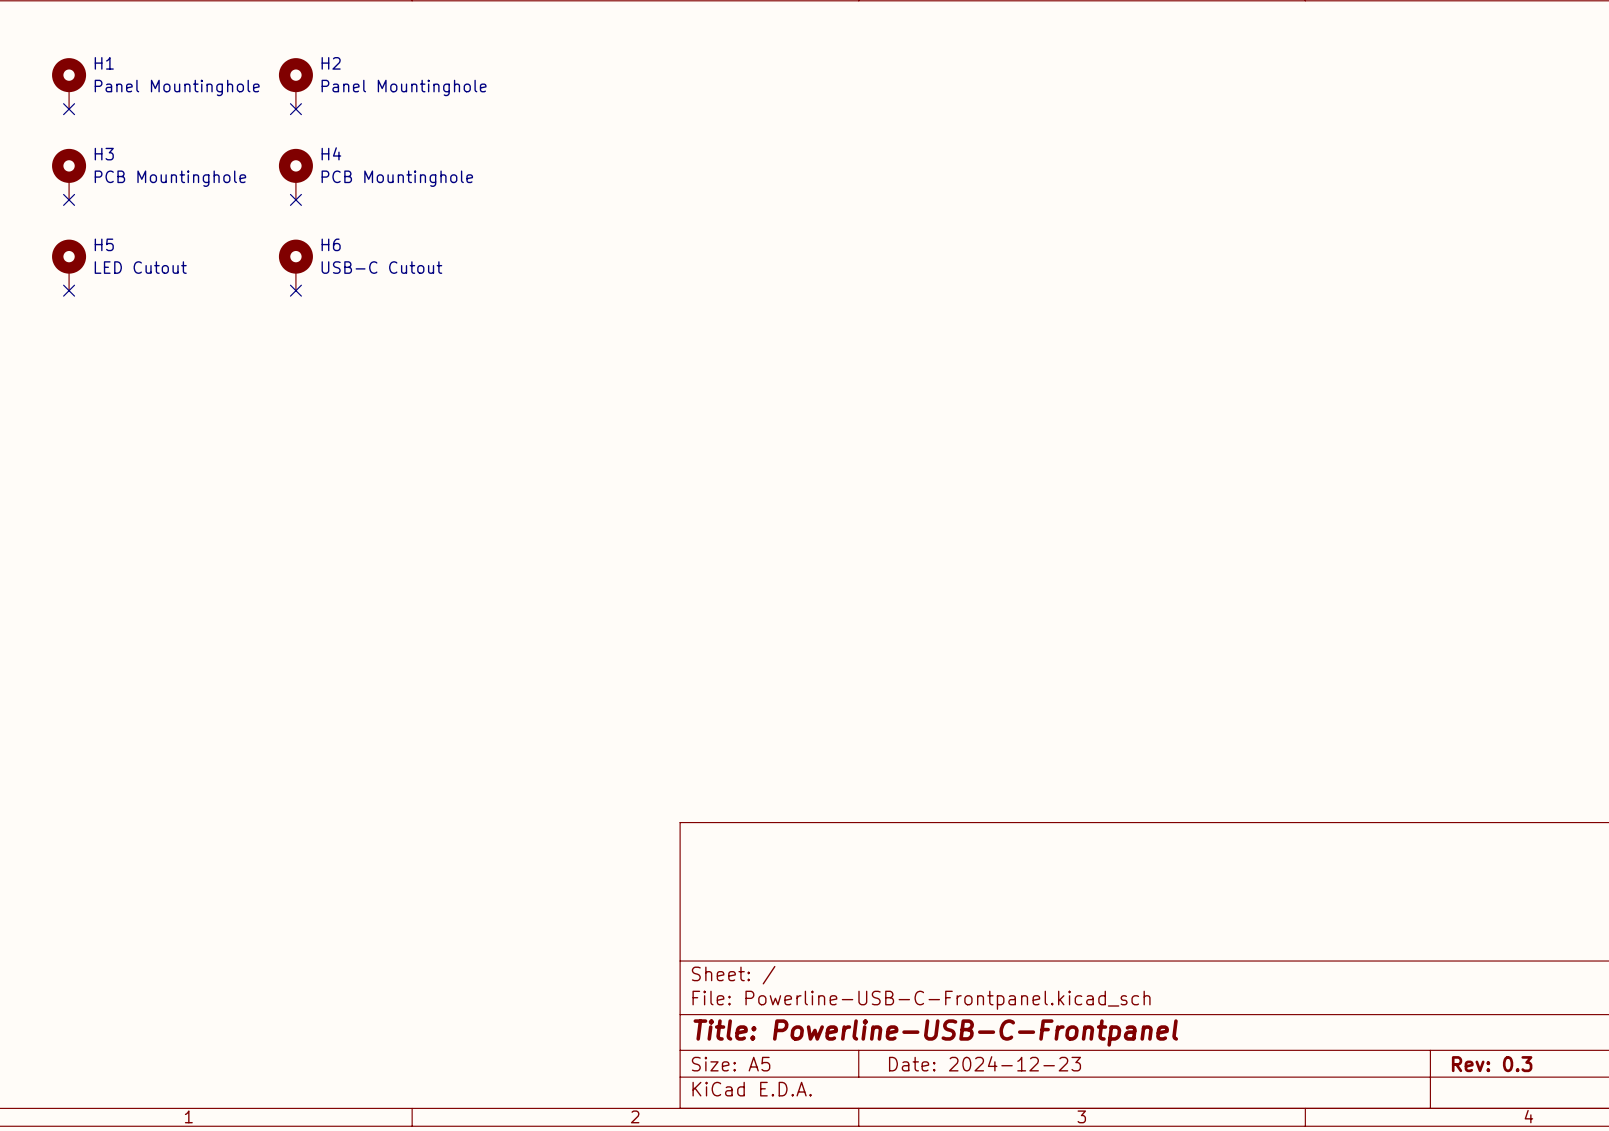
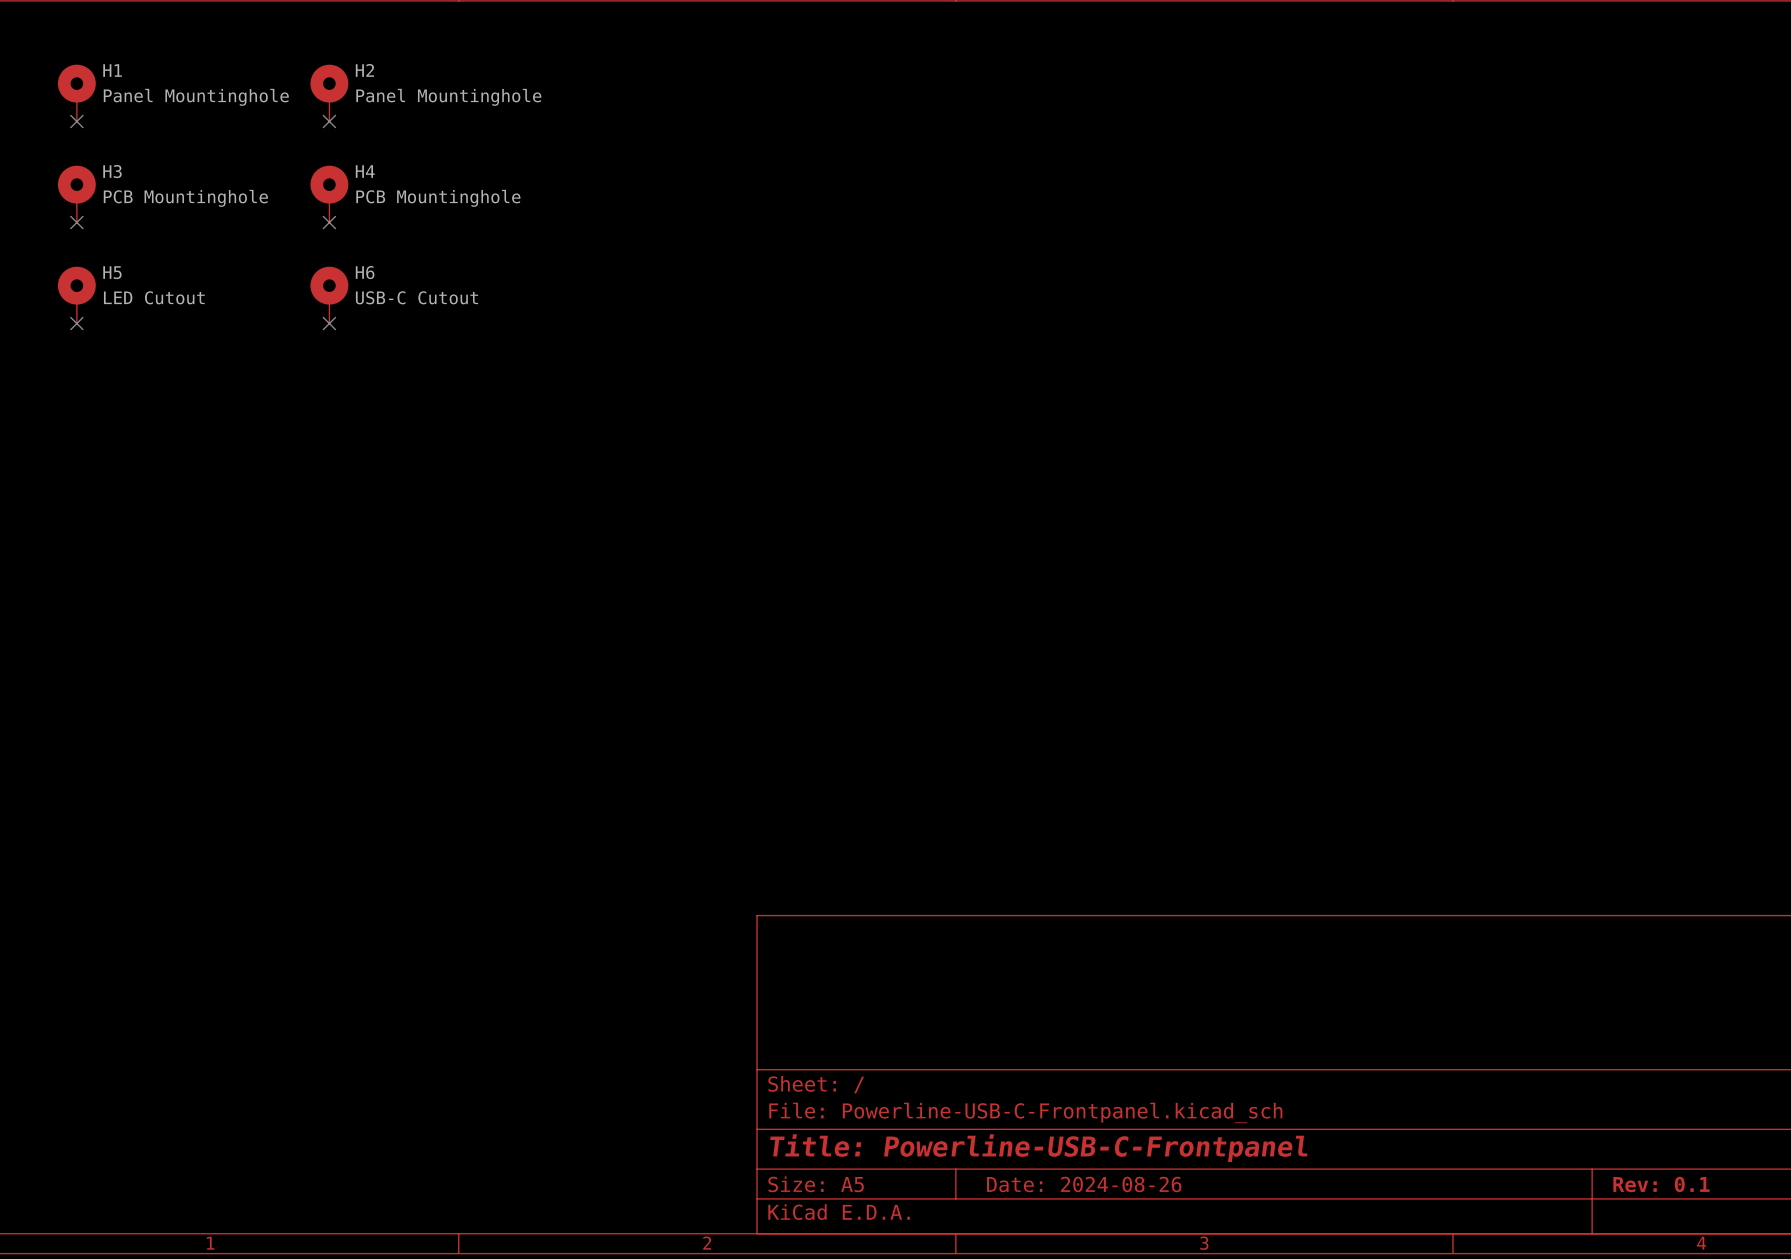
title block: Date: 2024-12-23 (985, 1063) -> Date: 2024-08-26 (1084, 1184)
title block: Rev: 0.3 (1492, 1064) -> Rev: 0.1 (1661, 1184)

